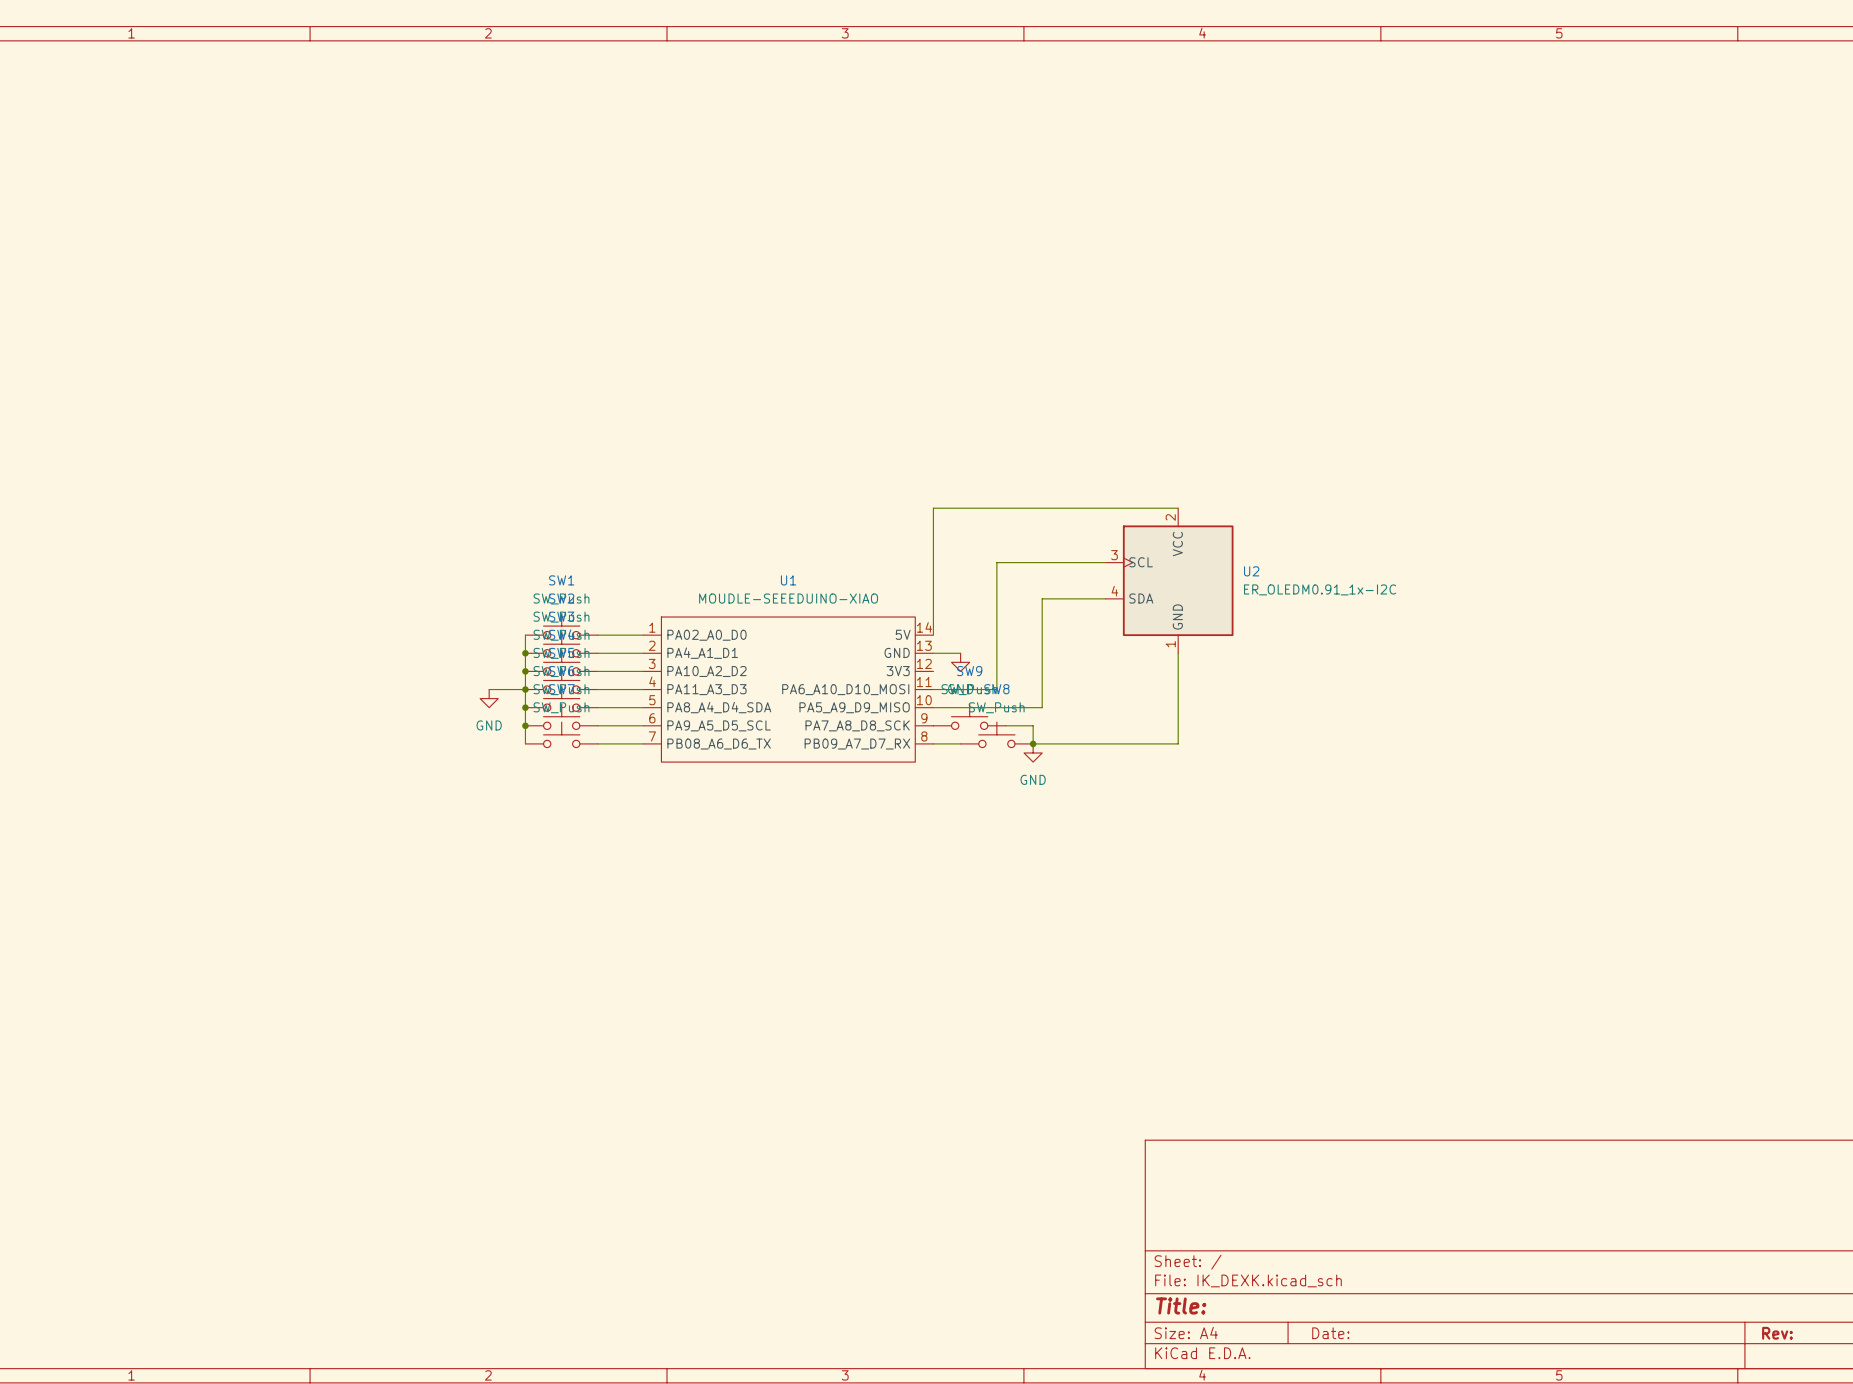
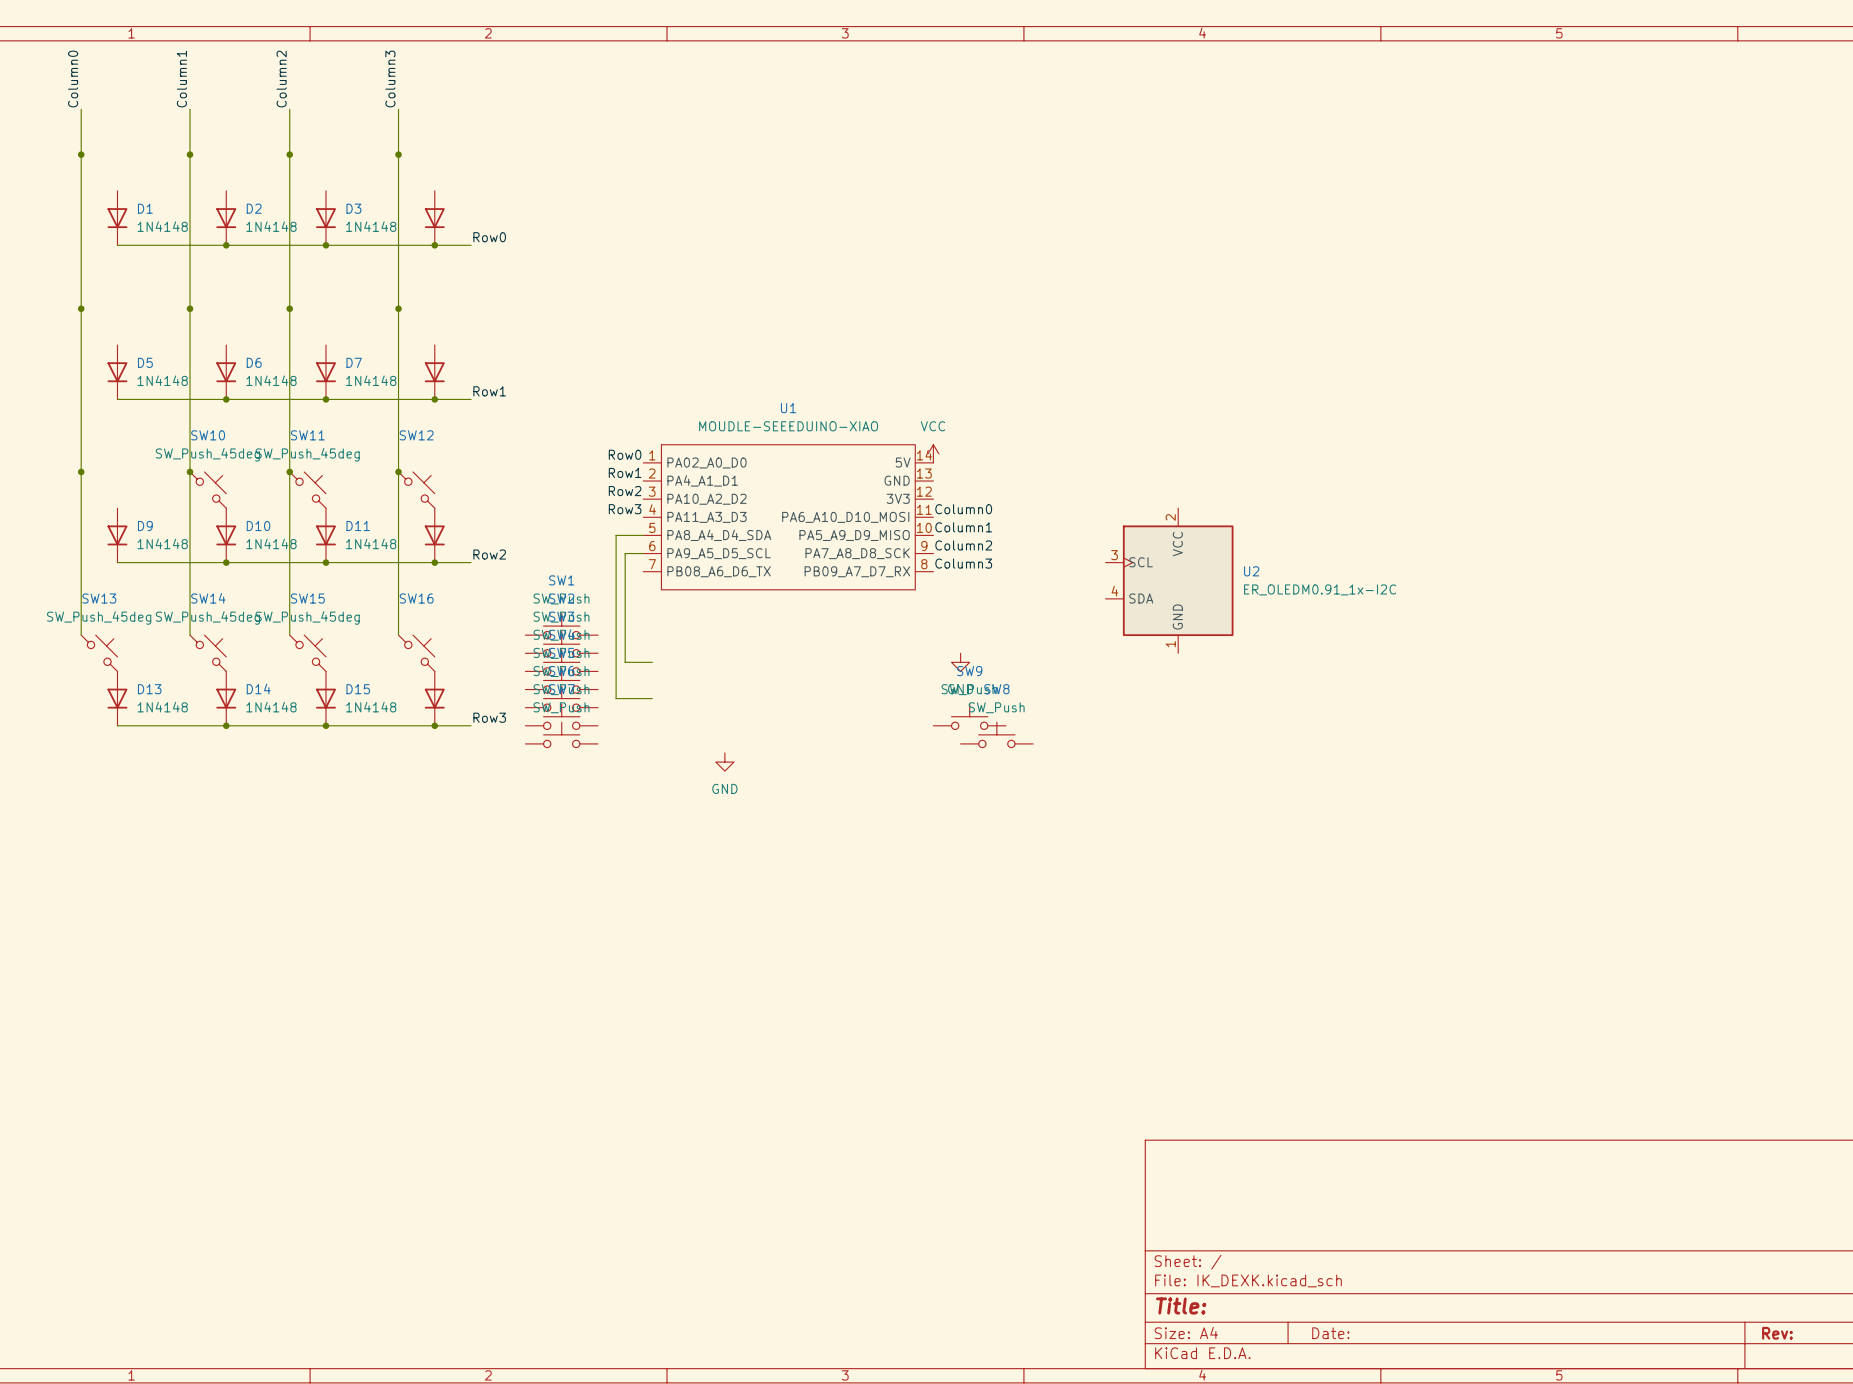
label: none -> Column0 (73, 79)
label: none -> Column1 (181, 79)
label: none -> Column2 (281, 79)
label: none -> Column3 (390, 79)
wire: none -> (81, 109) (81, 635)
wire: none -> (190, 109) (190, 635)
wire: none -> (289, 109) (289, 635)
wire: none -> (398, 109) (398, 635)
junction: none -> (81, 154)
junction: none -> (190, 154)
junction: none -> (289, 154)
junction: none -> (398, 154)
D1: none -> 1N4148 (117, 218)
D2: none -> 1N4148 (226, 218)
D3: none -> 1N4148 (325, 218)
part: none -> (434, 218)
label: none -> Row0 (489, 237)
wire: none -> (117, 245) (471, 245)
junction: none -> (226, 245)
junction: none -> (325, 245)
junction: none -> (434, 245)
junction: none -> (81, 308)
junction: none -> (190, 308)
junction: none -> (289, 308)
junction: none -> (398, 308)
D5: none -> 1N4148 (117, 372)
D6: none -> 1N4148 (226, 372)
D7: none -> 1N4148 (325, 372)
part: none -> (434, 372)
label: none -> Row1 (489, 391)
wire: none -> (117, 399) (471, 399)
junction: none -> (226, 399)
junction: none -> (325, 399)
junction: none -> (434, 399)
power symbol: none -> VCC (933, 453)
label: none -> Row0 (625, 454)
junction: none -> (81, 471)
junction: none -> (190, 471)
junction: none -> (289, 471)
junction: none -> (398, 471)
label: none -> Row1 (625, 472)
SW10: none -> SW_Push_45deg (208, 490)
SW11: none -> SW_Push_45deg (307, 490)
SW12: none -> (416, 490)
label: none -> Row2 (625, 491)
wire: (1178, 508) (933, 508) (933, 635) -> none
label: none -> Row3 (625, 509)
label: none -> Column0 (963, 509)
label: none -> Column1 (963, 527)
D9: none -> 1N4148 (117, 535)
D10: none -> 1N4148 (226, 535)
D11: none -> 1N4148 (325, 535)
part: none -> (434, 535)
wire: none -> (643, 535) (616, 535) (616, 698) (652, 698)
label: none -> Column2 (963, 545)
wire: none -> (643, 553) (625, 553) (625, 662) (652, 662)
label: none -> Row2 (489, 554)
wire: none -> (117, 562) (471, 562)
junction: none -> (226, 562)
junction: none -> (325, 562)
junction: none -> (434, 562)
wire: (1105, 562) (996, 562) (996, 689) (933, 689) -> none
label: none -> Column3 (963, 563)
wire: (1105, 598) (1042, 598) (1042, 707) (933, 707) -> none
wire: (525, 635) (525, 743) -> none
wire: (597, 635) (643, 635) -> none
SW13: none -> SW_Push_45deg (99, 653)
SW14: none -> SW_Push_45deg (208, 653)
SW15: none -> SW_Push_45deg (307, 653)
SW16: none -> (416, 653)
junction: (525, 653) -> none
wire: (597, 653) (643, 653) -> none
wire: (933, 653) (960, 653) -> none
wire: (1178, 653) (1178, 743) (1033, 743) (1033, 725) (1005, 725) -> none
junction: (525, 671) -> none
wire: (597, 671) (643, 671) -> none
wire: (489, 689) (525, 689) -> none
junction: (525, 689) -> none
wire: (597, 689) (643, 689) -> none
U1 position: (788, 689) -> (788, 517)
D13: none -> 1N4148 (117, 698)
D14: none -> 1N4148 (226, 698)
D15: none -> 1N4148 (325, 698)
part: none -> (434, 698)
power symbol: GND (489, 698) -> none
junction: (525, 707) -> none
wire: (597, 707) (643, 707) -> none
label: none -> Row3 (489, 717)
wire: none -> (117, 725) (471, 725)
junction: none -> (226, 725)
junction: none -> (325, 725)
junction: none -> (434, 725)
junction: (525, 725) -> none
wire: (597, 725) (643, 725) -> none
wire: (597, 743) (643, 743) -> none
wire: (933, 743) (960, 743) -> none
junction: (1033, 743) -> none
power symbol: GND (1033, 753) -> none
power symbol: none -> GND (724, 762)

